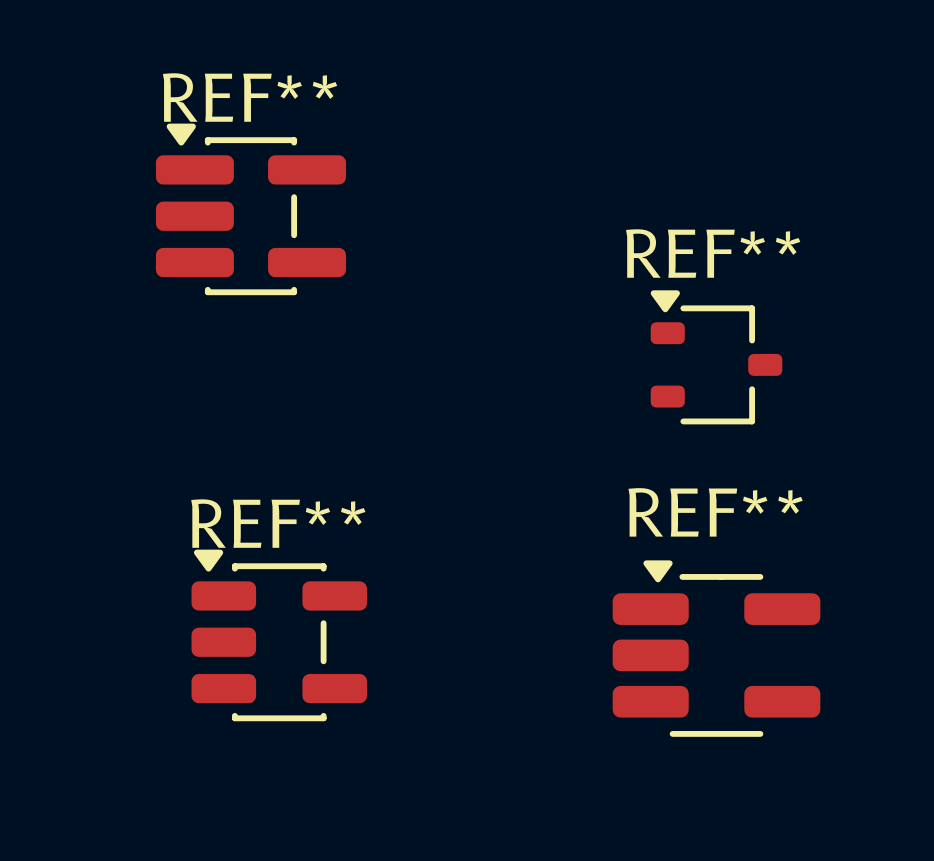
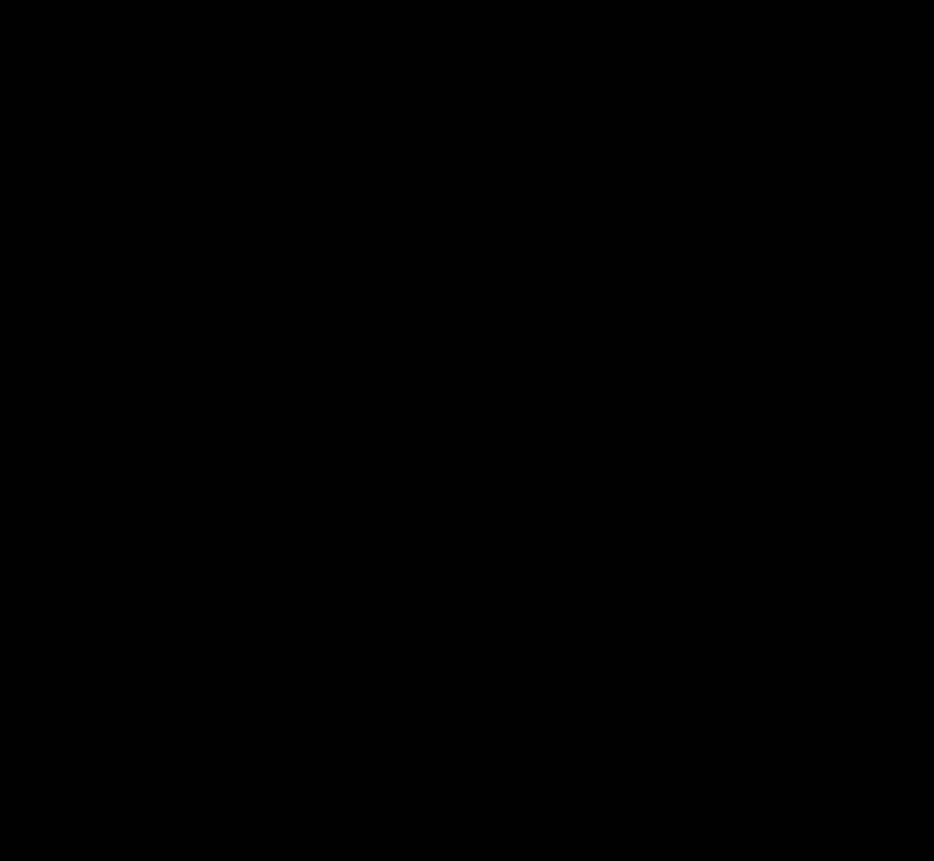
REF**: (250, 209) -> none
REF**: (716, 357) -> none
REF**: (279, 635) -> none
REF**: (716, 648) -> none

